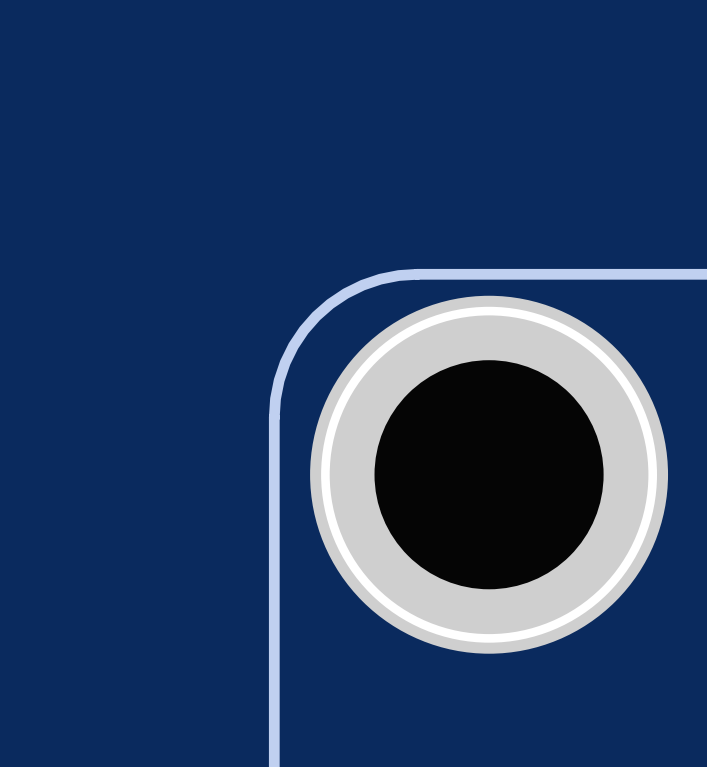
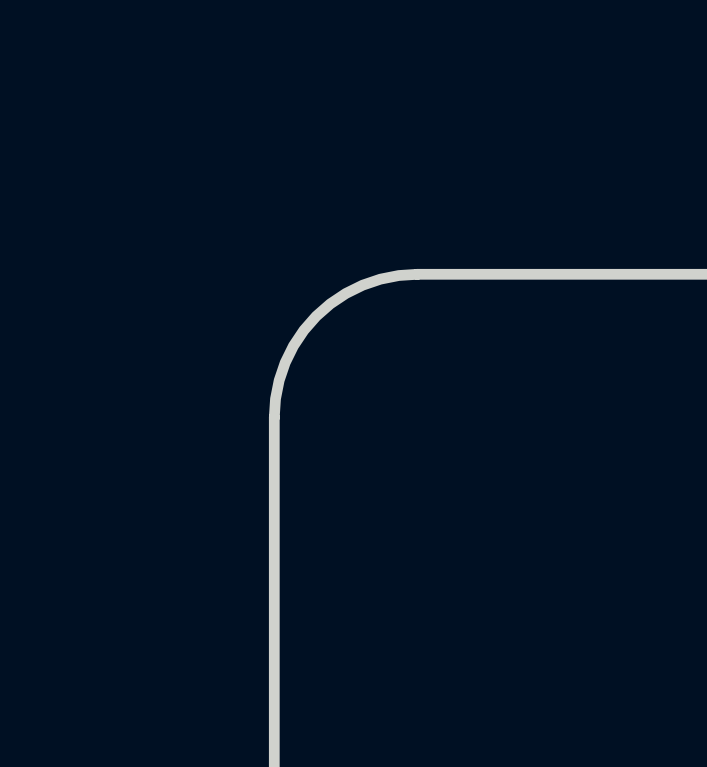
part: (489, 474) -> none

